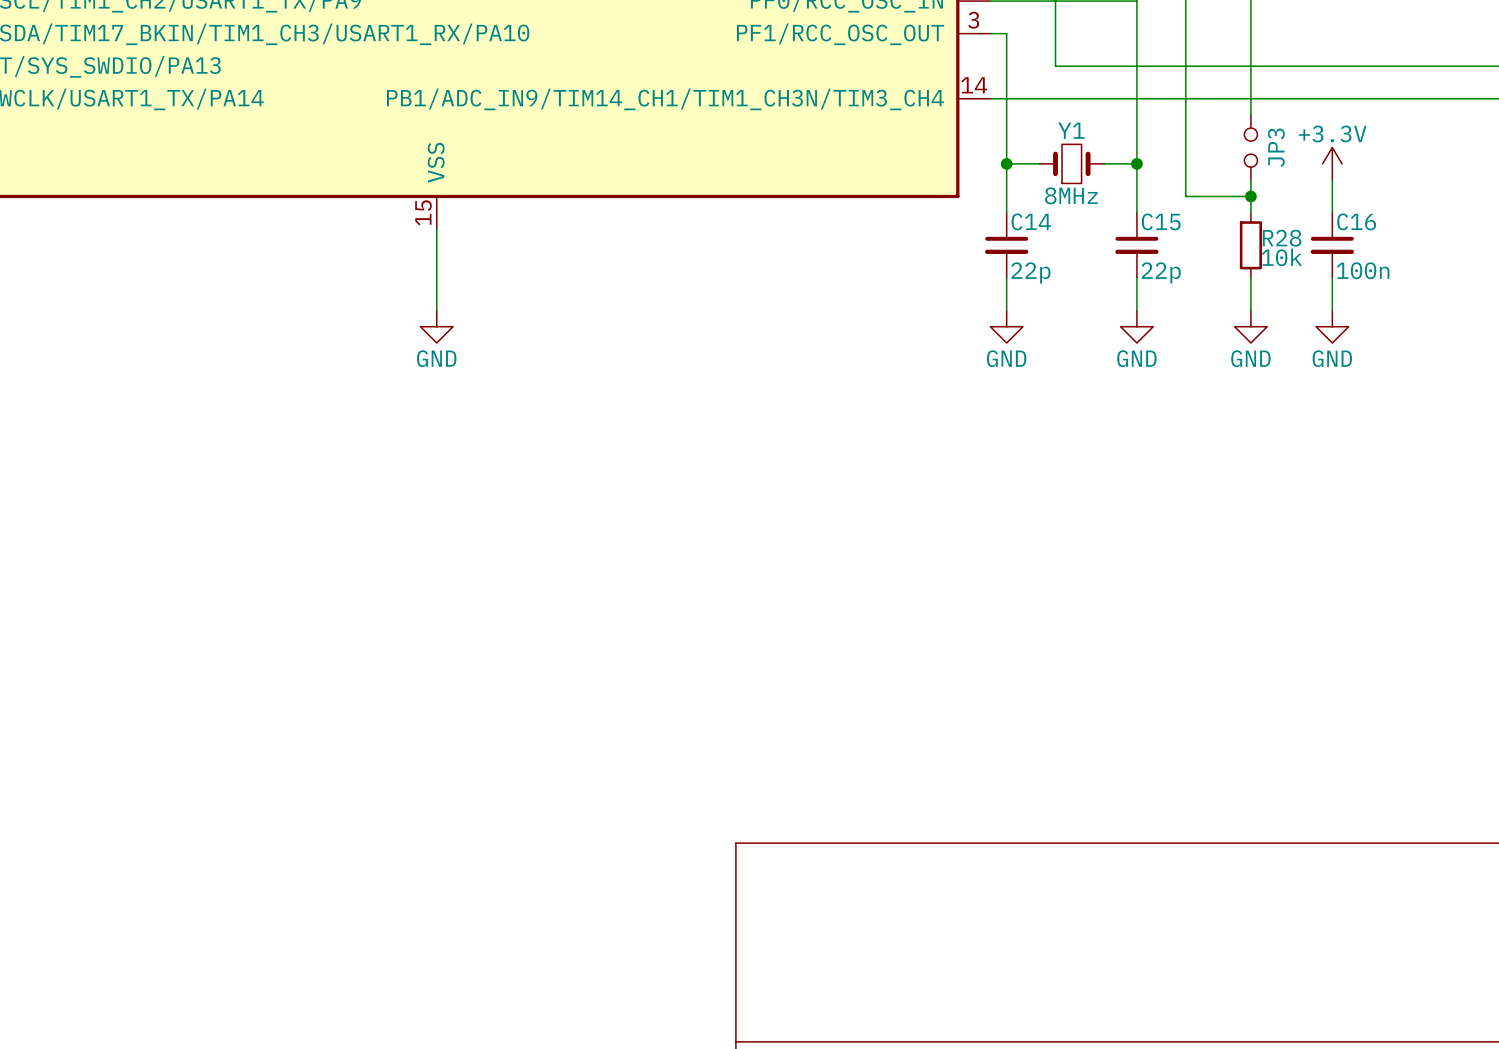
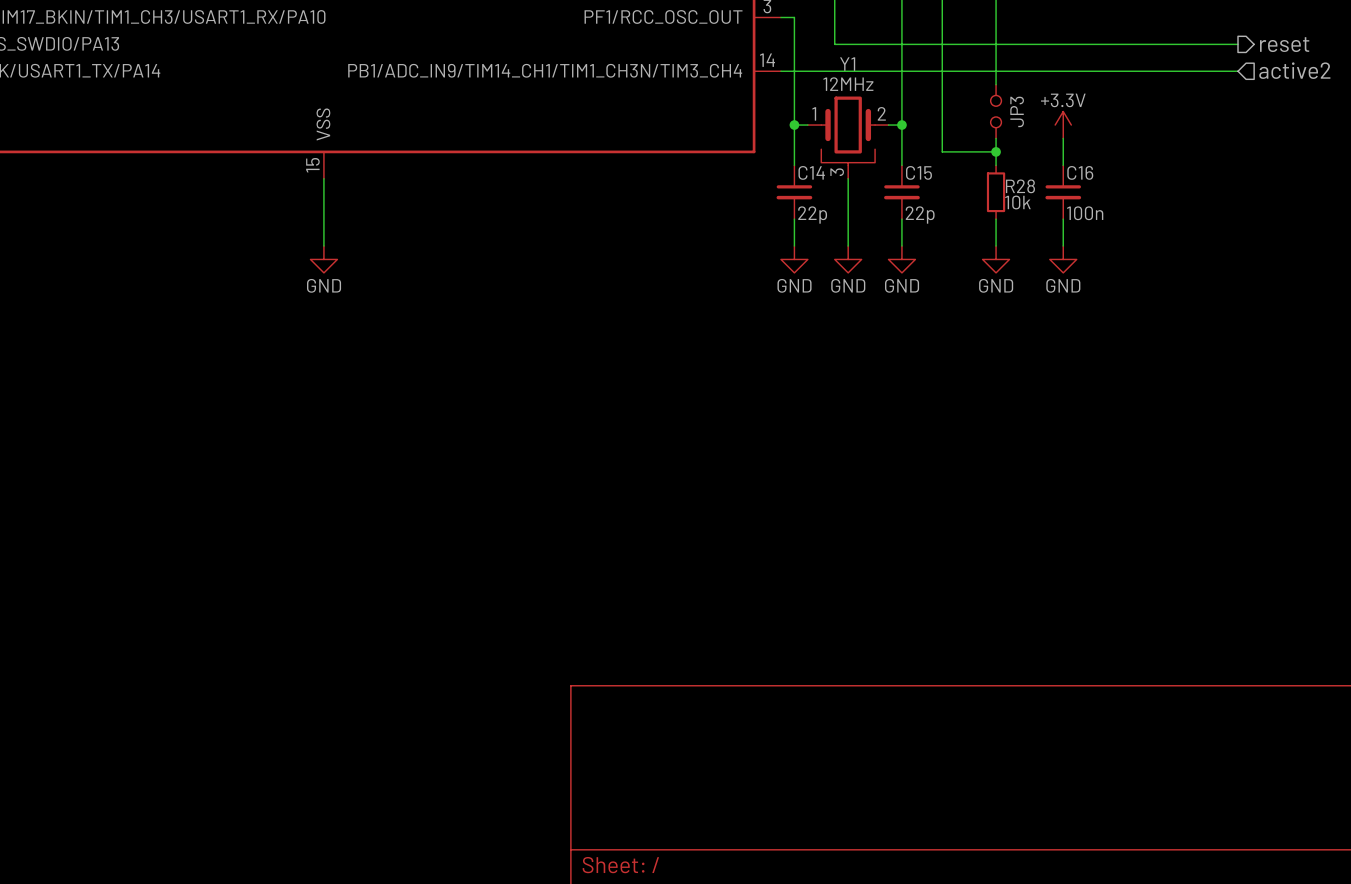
Y1 name position: Y1 (1071, 130) -> Y1 (847, 64)
Y1 symbol: [1039, 144, 1105, 184] -> [807, 96, 889, 179]
Y1 value: 8MHz (1071, 195) -> 12MHz (848, 84)
wire: none -> (848, 178) (848, 246)
power symbol: none -> GND (848, 259)

